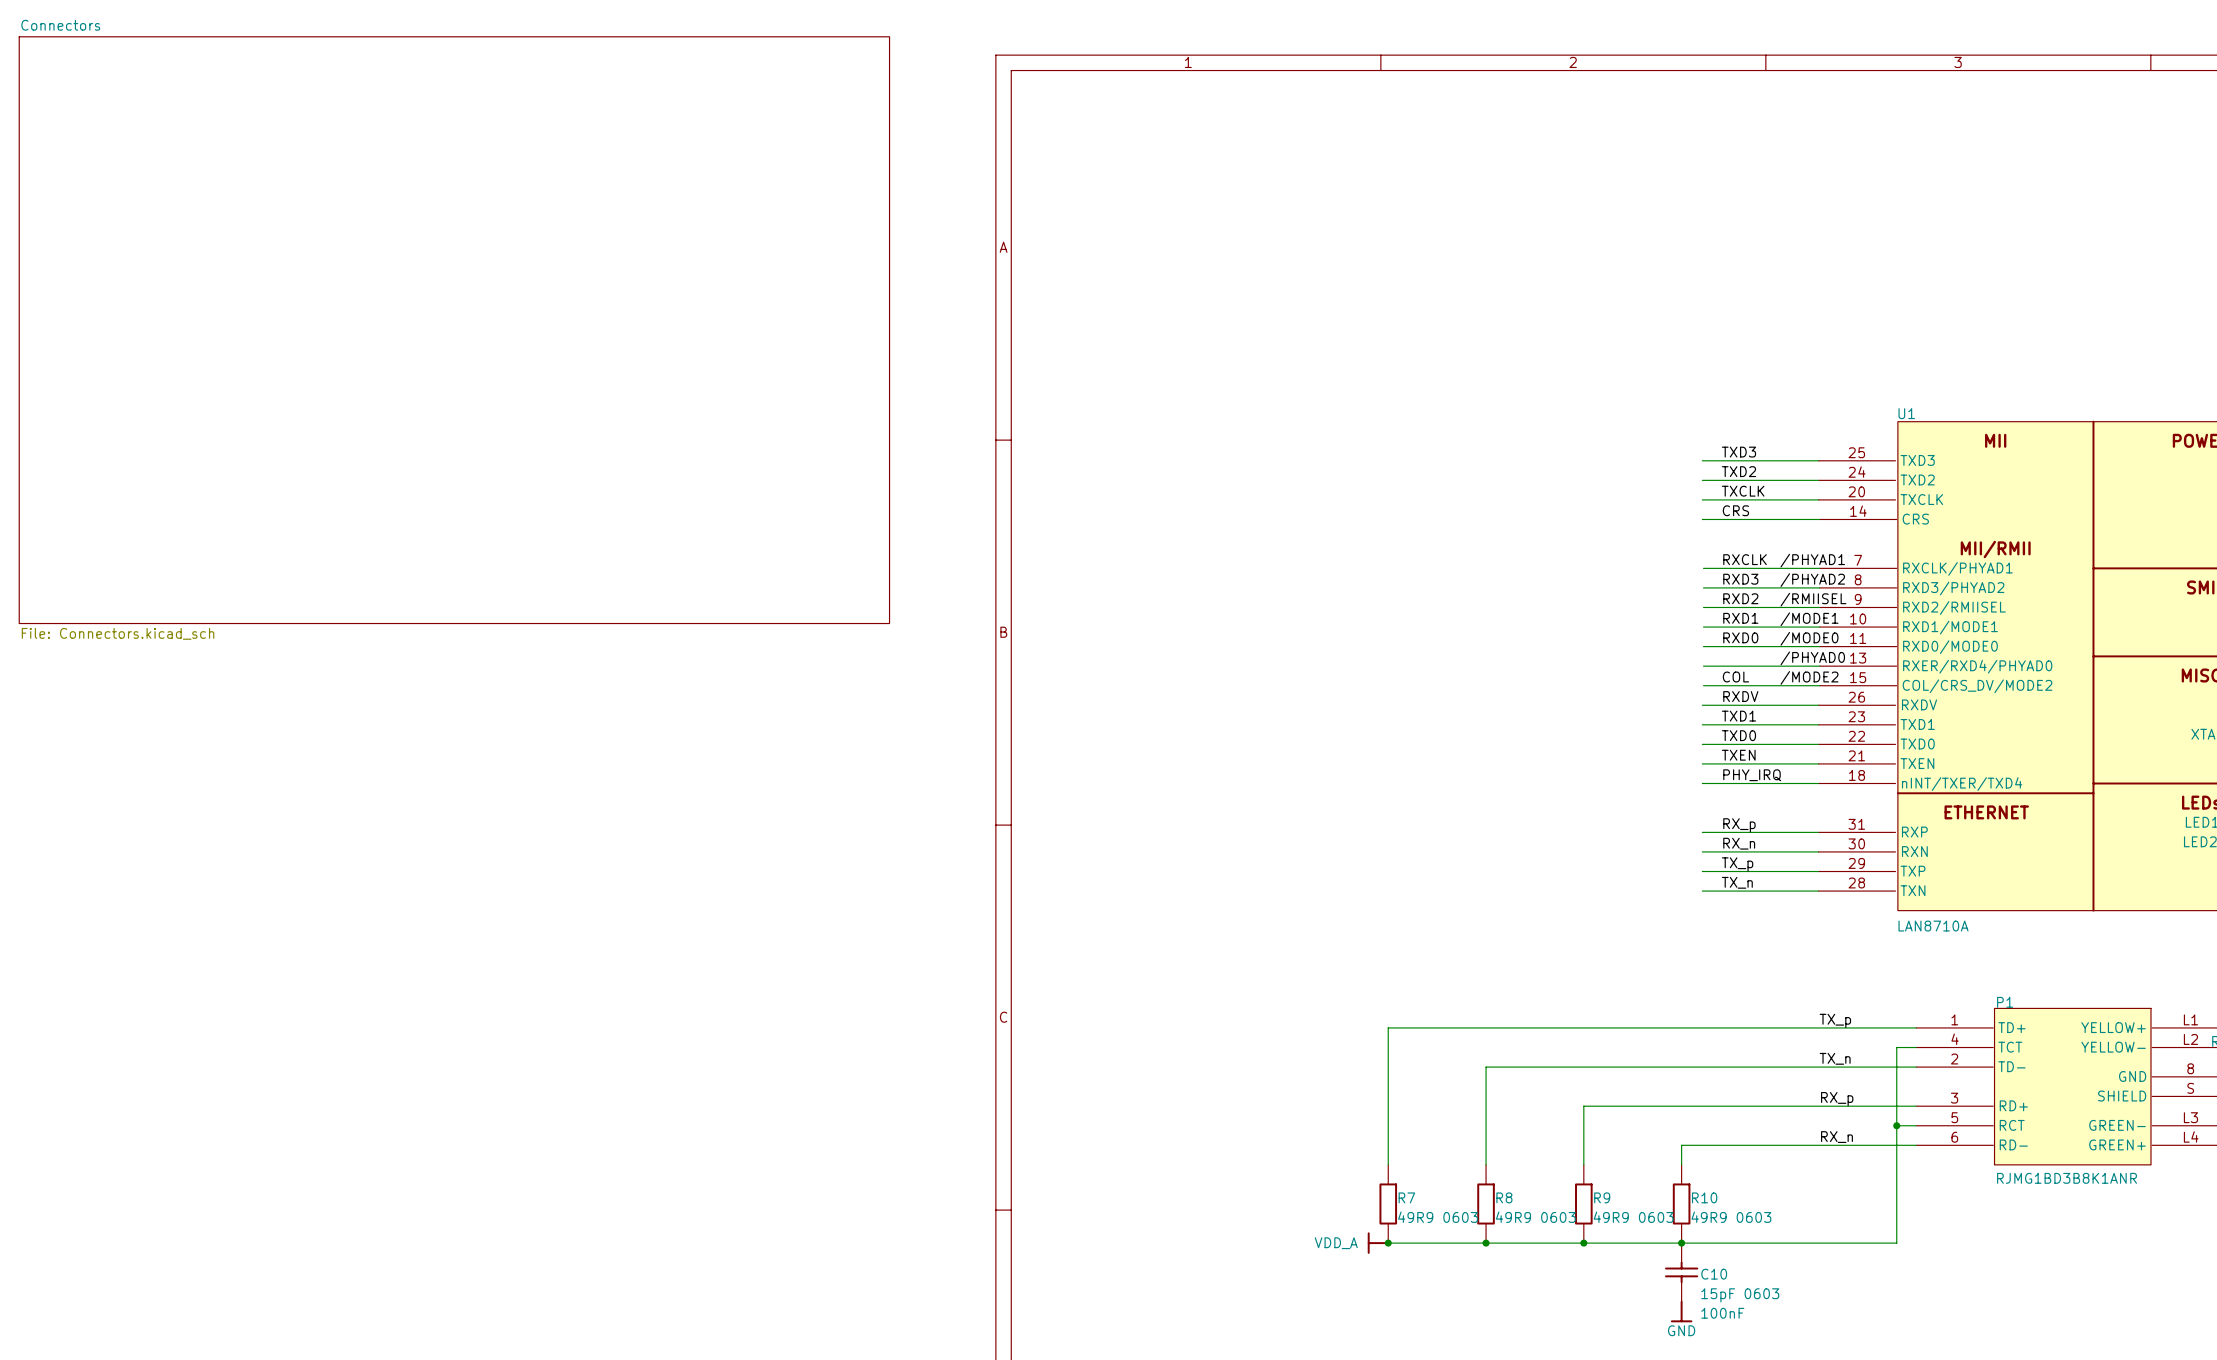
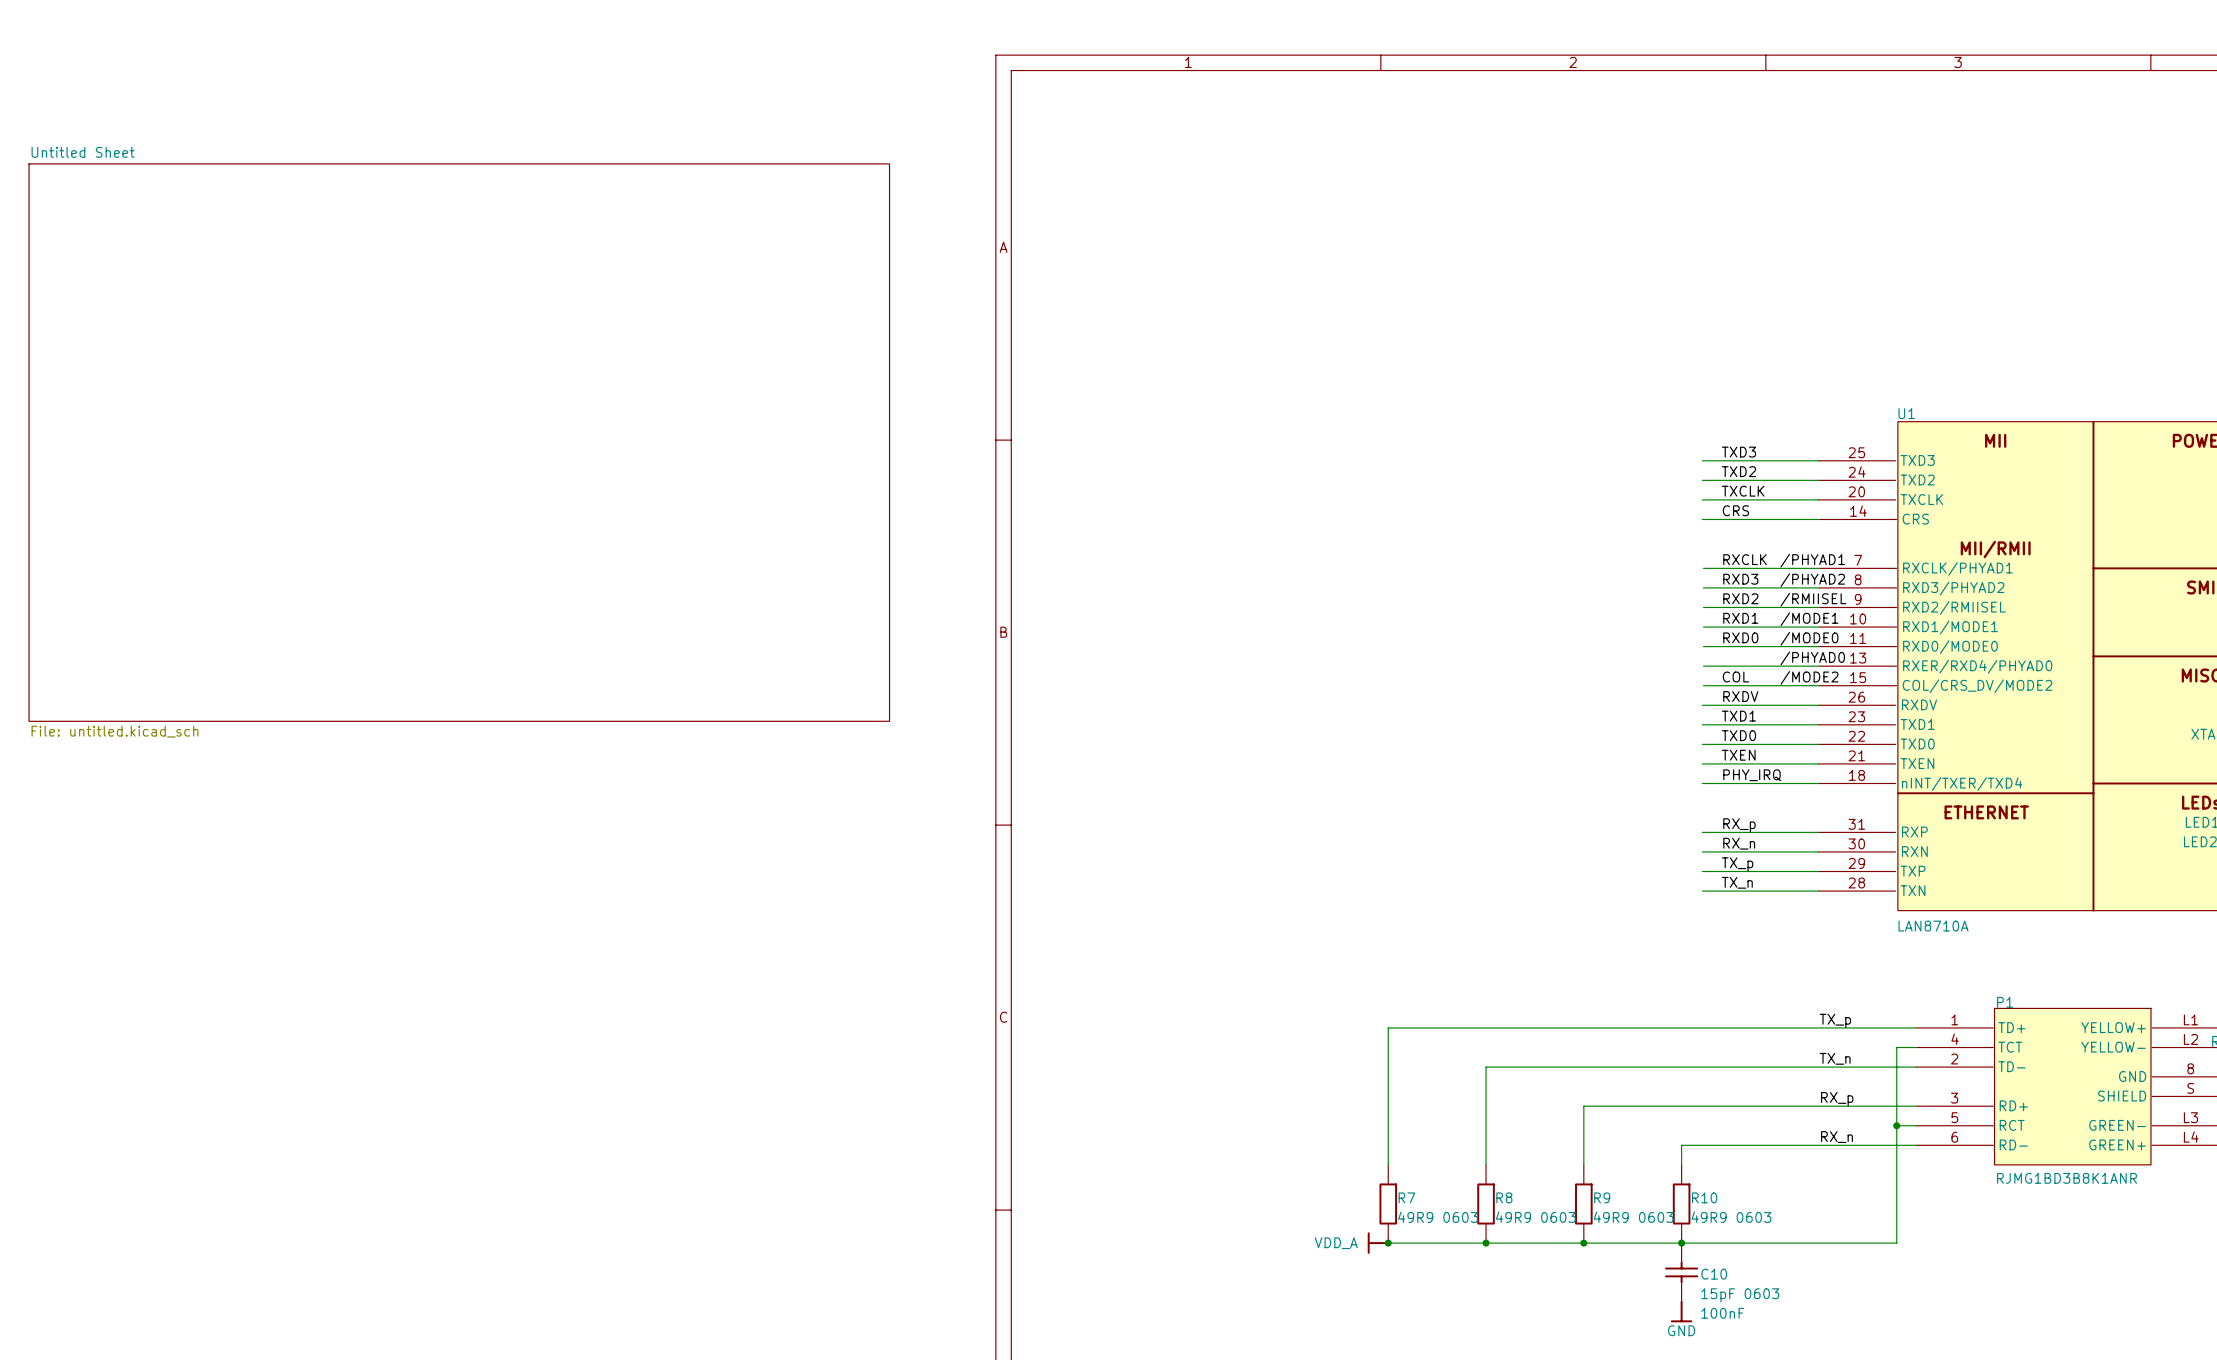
sheet Connectors: File: Connectors.kicad_sch (454, 330) -> none
sheet Untitled Sheet: none -> File: untitled.kicad_sch (459, 442)

